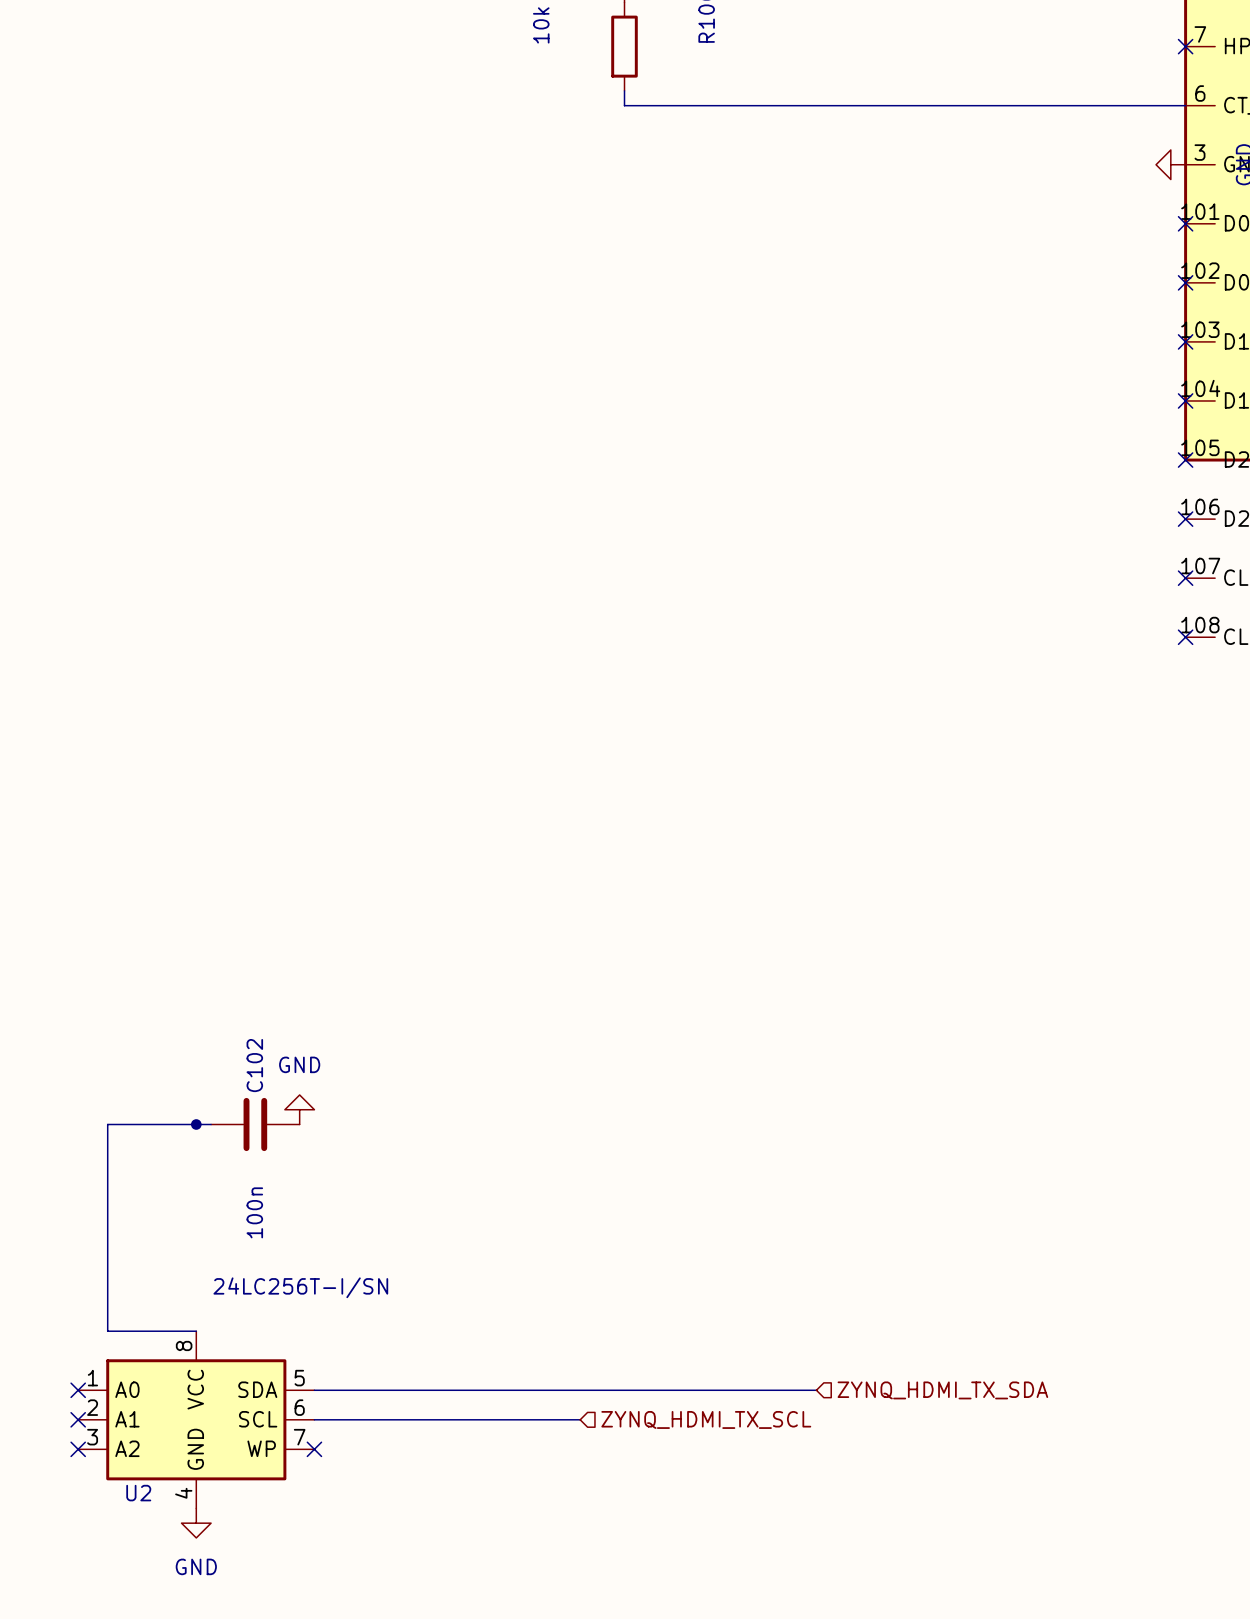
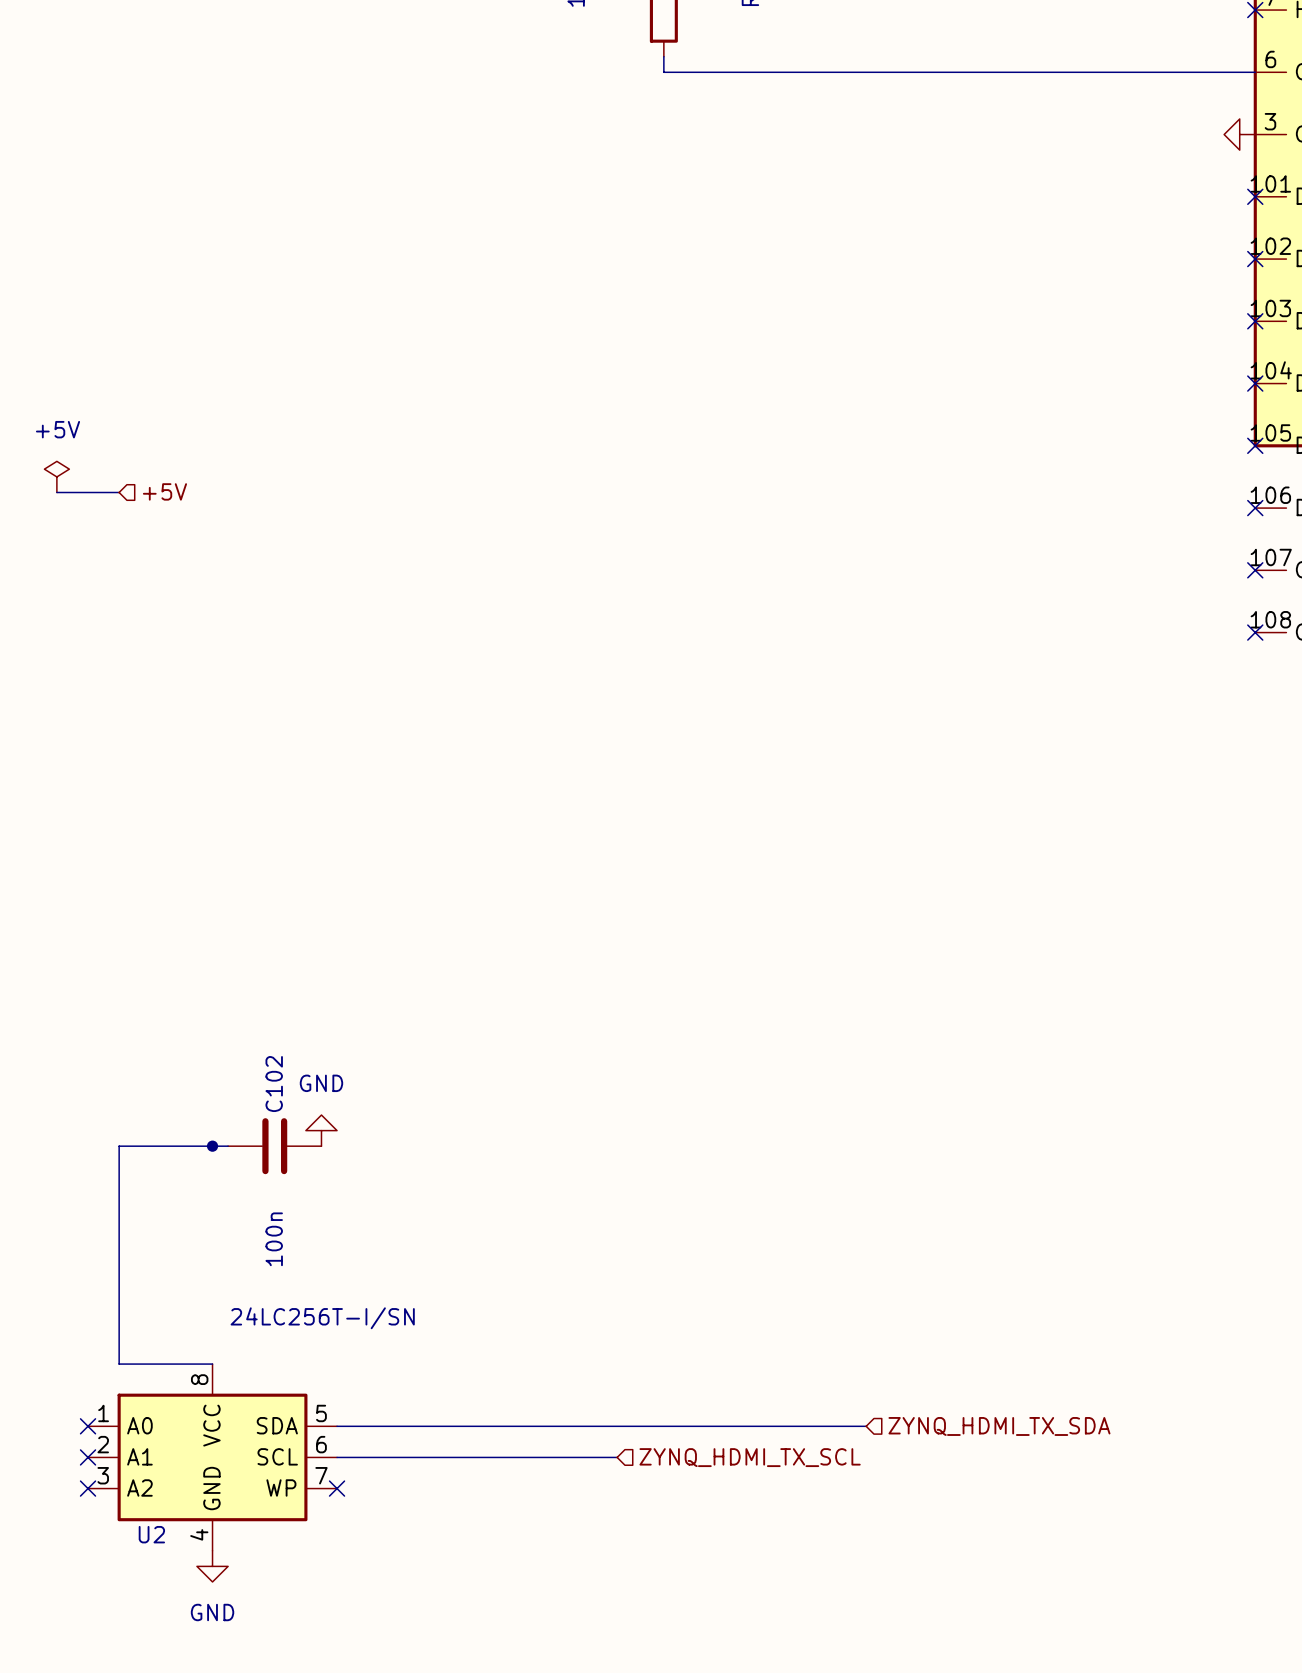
power symbol: none -> +5V (56, 476)
hierarchical label: none -> +5V (164, 491)
wire: none -> (56, 492) (119, 492)

